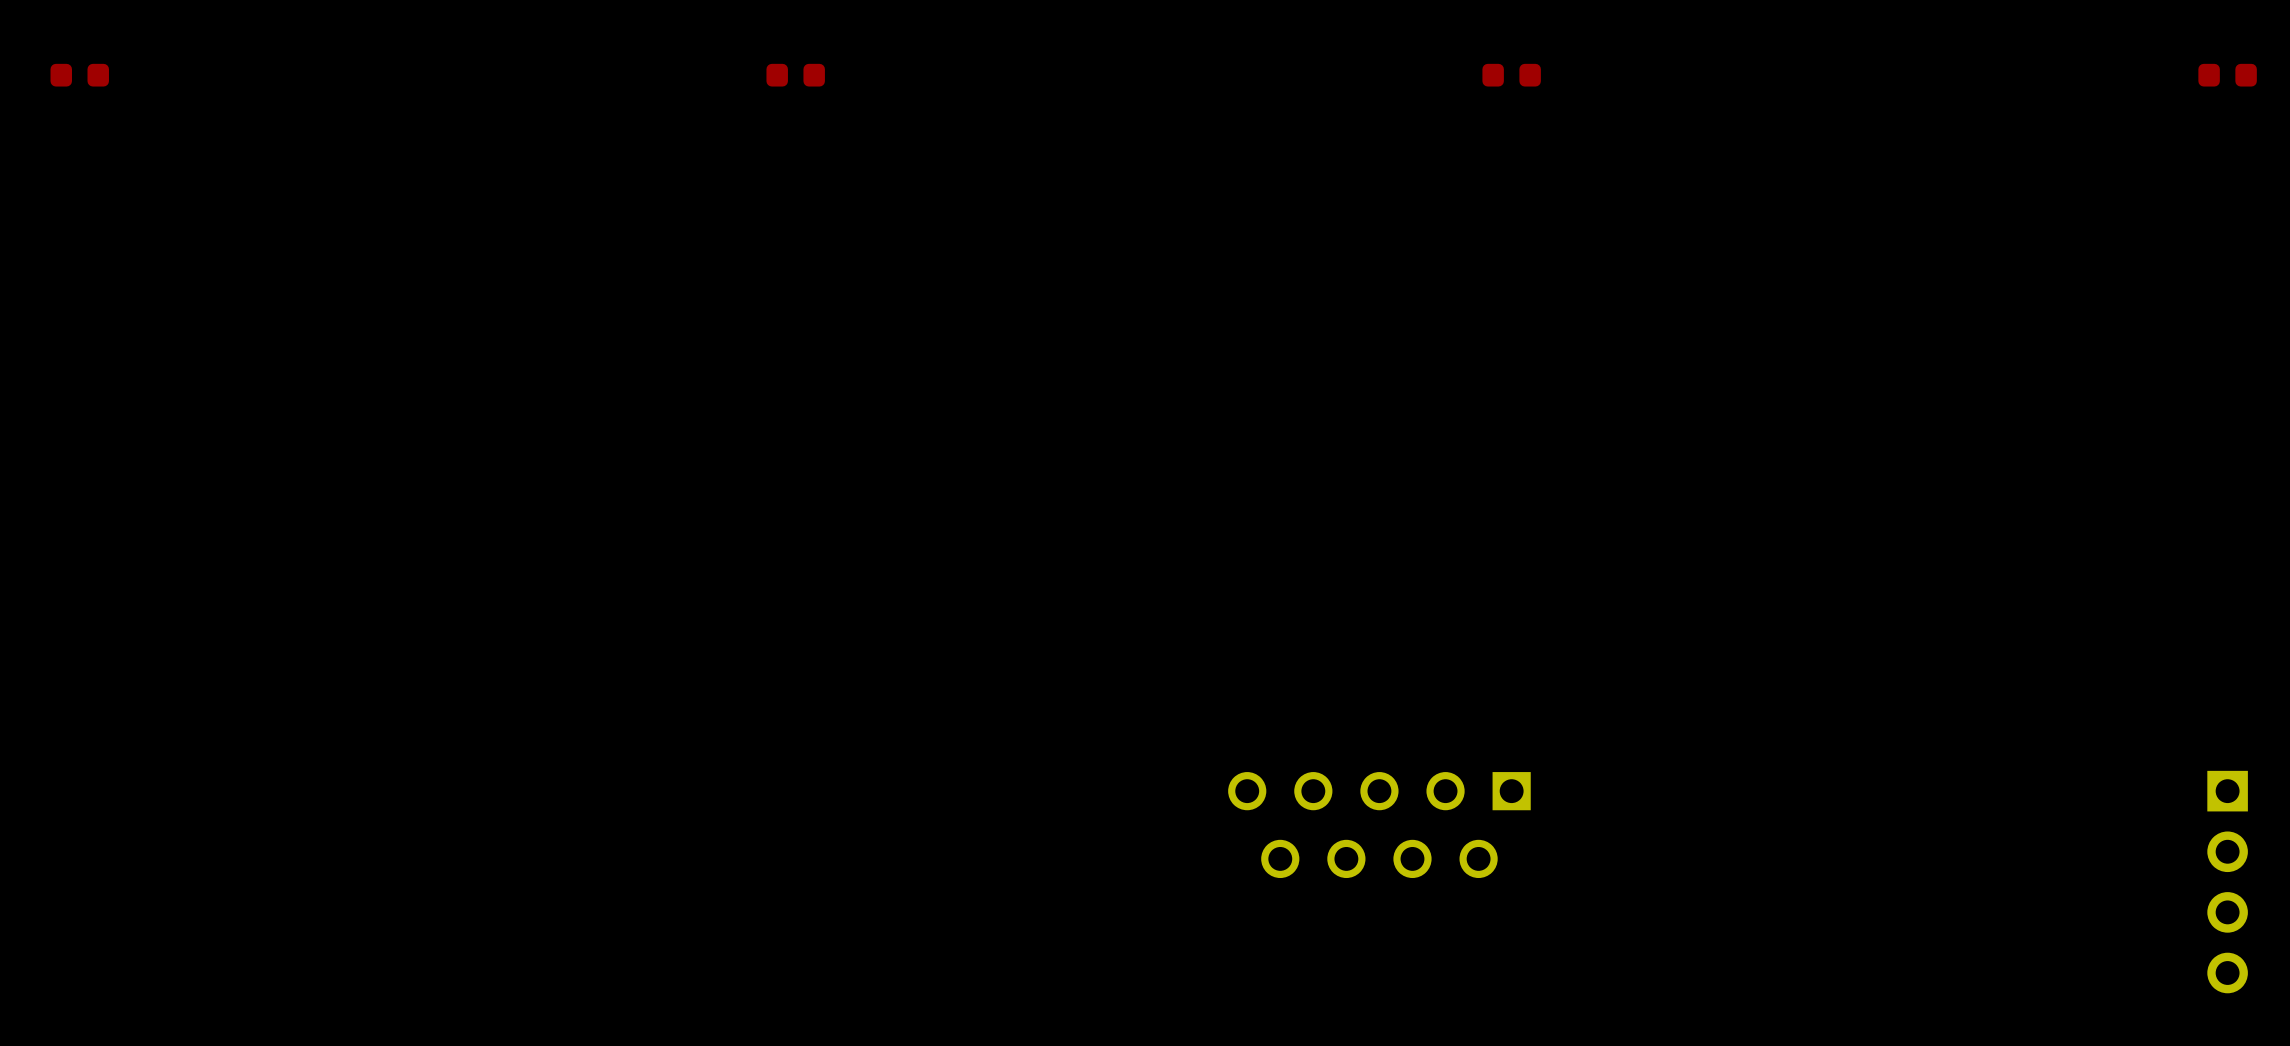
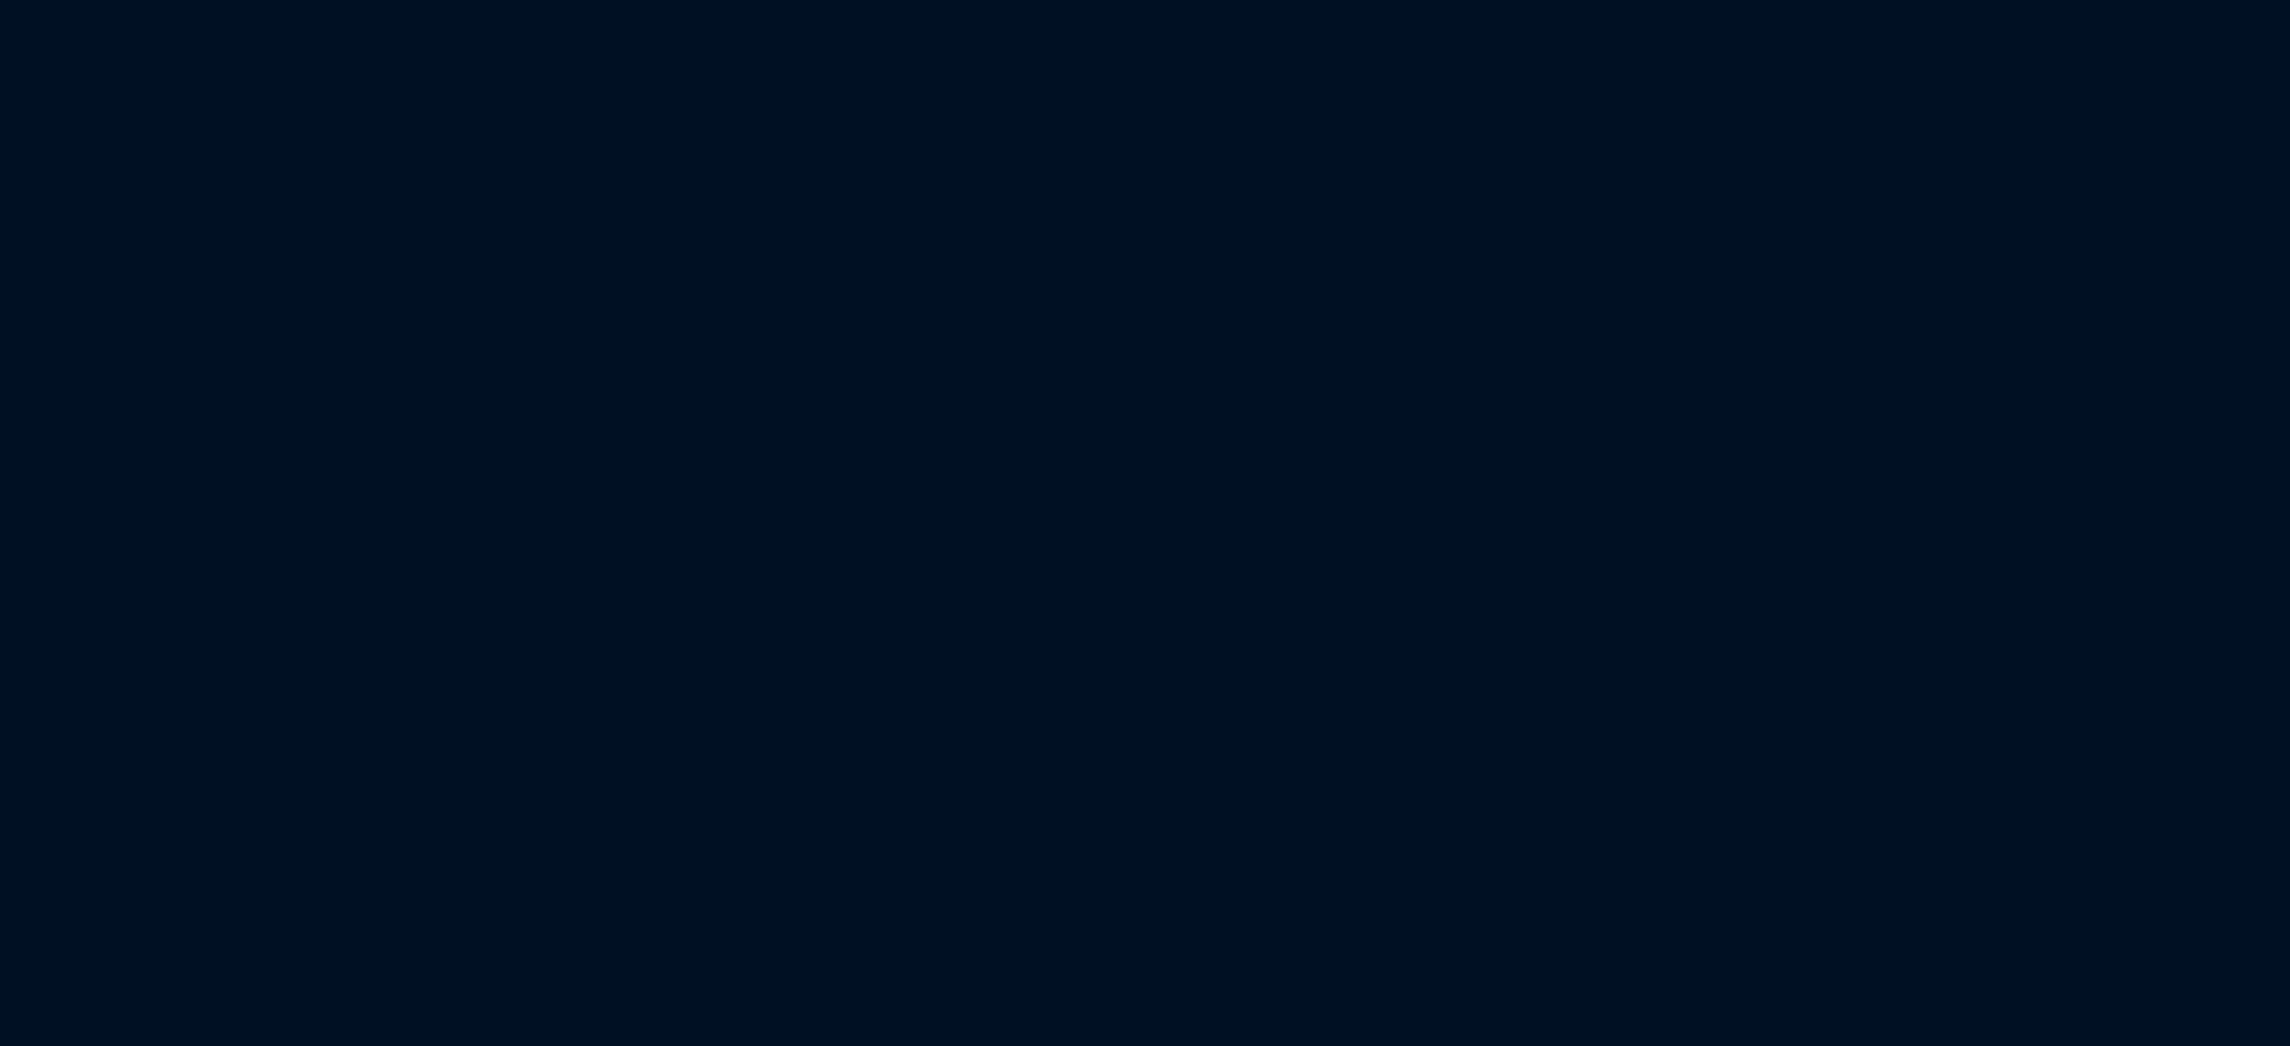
part: (79, 75) -> none
part: (795, 75) -> none
part: (1511, 75) -> none
part: (2227, 75) -> none
part: (1379, 825) -> none
part: (2227, 882) -> none

